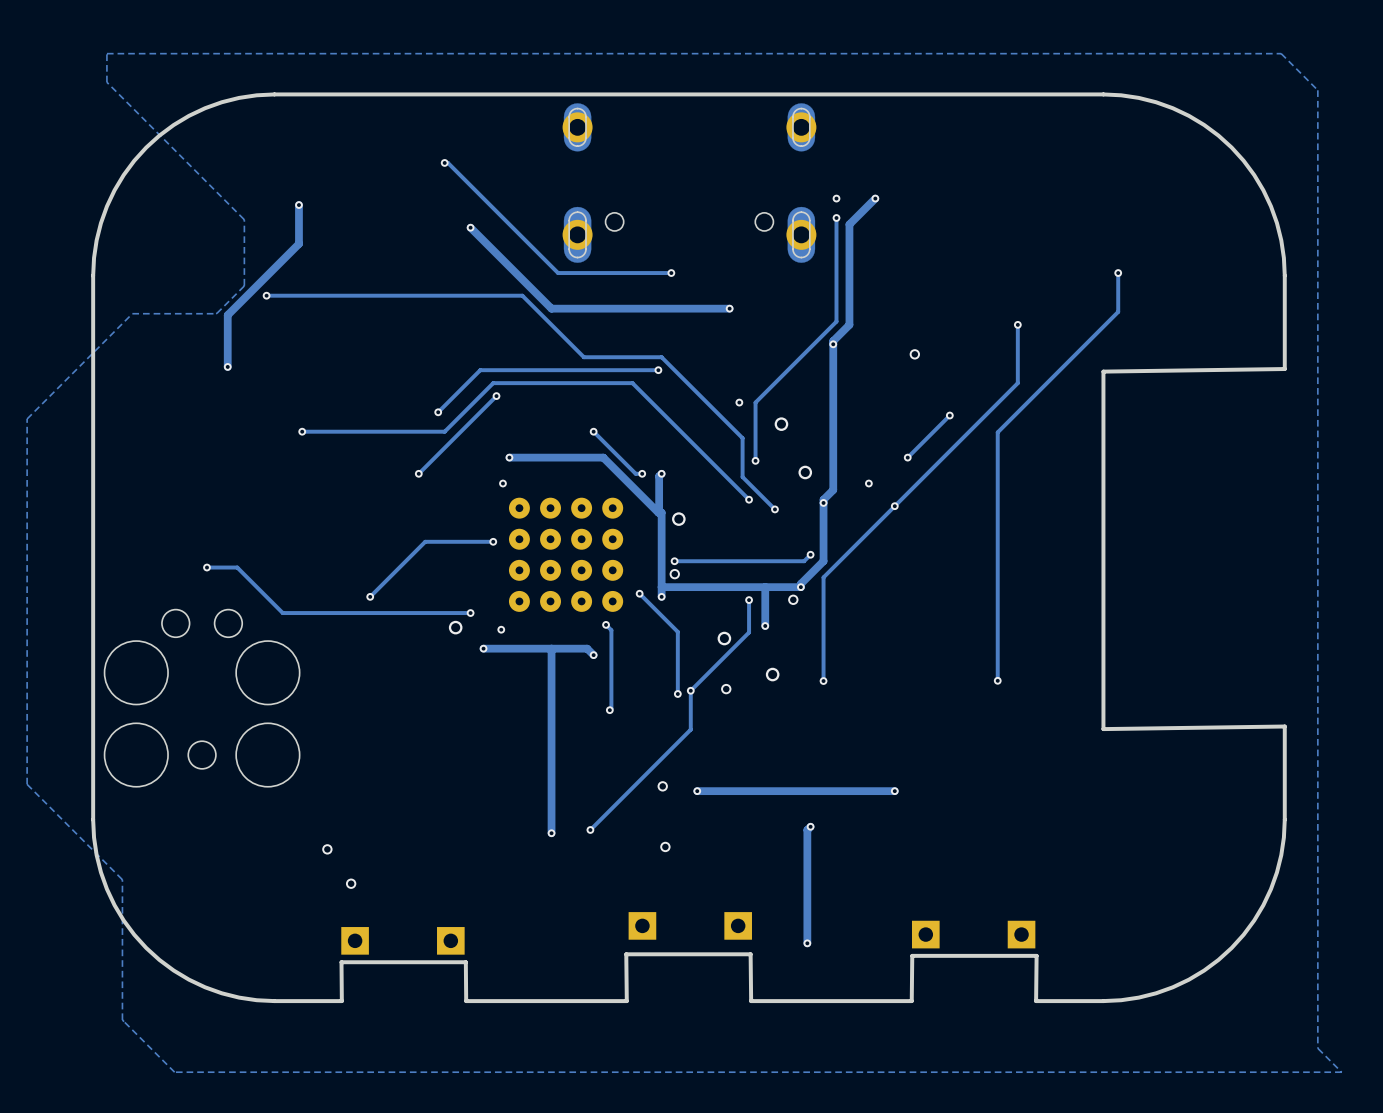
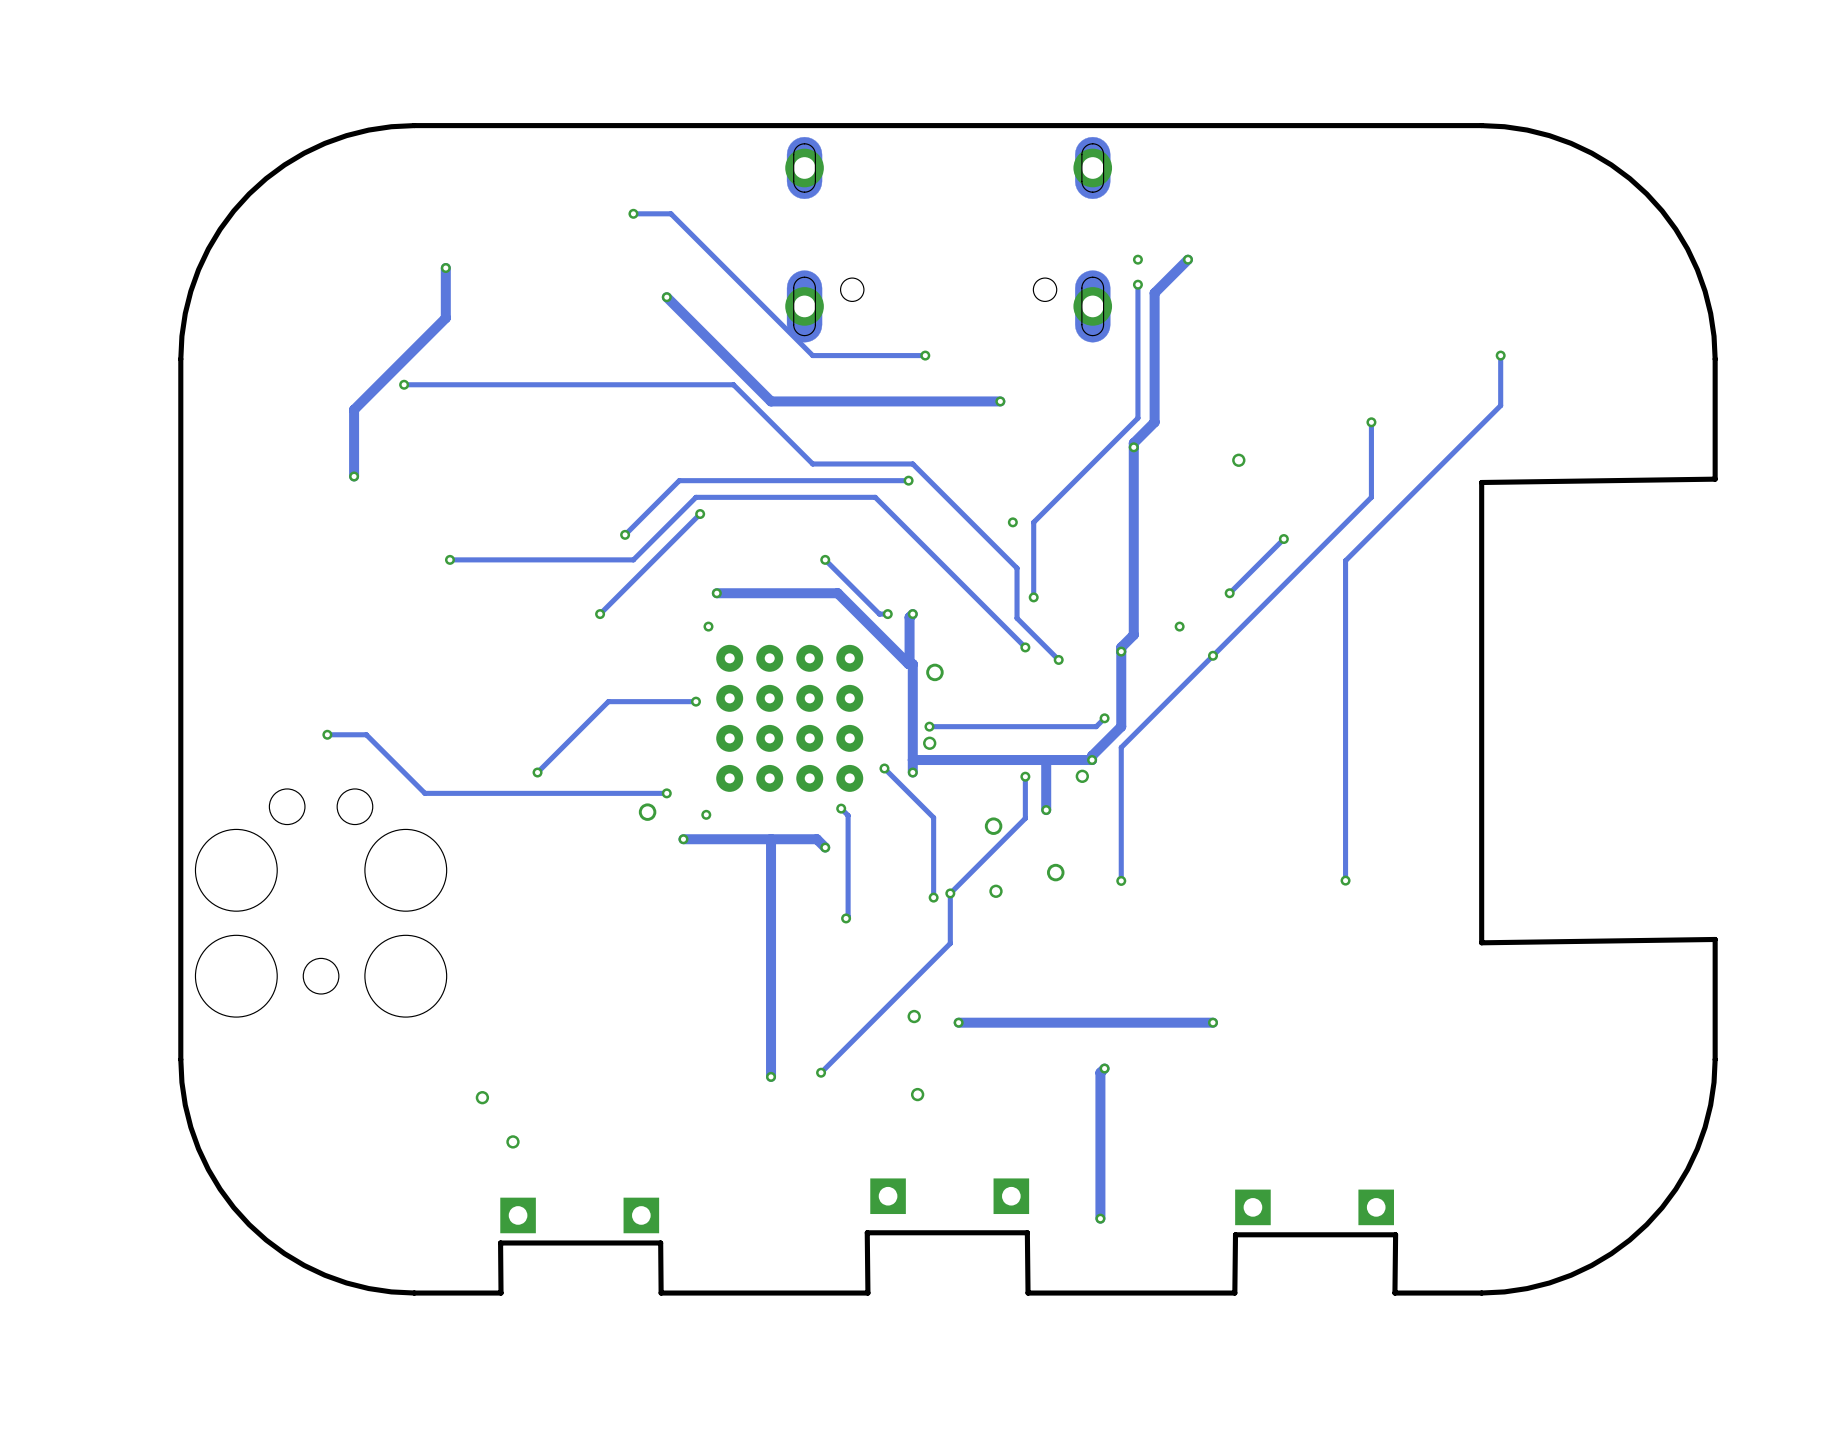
zone outline: (1281, 53) (106, 53) (106, 82) (244, 220) (244, 285) (216, 313) (132, 313) (27, 418) (27, 784) (122, 880) (122, 1020) (174, 1072) (1341, 1072) (1317, 1047) (1317, 90) (1281, 53) -> none
track: (447, 162) (558, 273) (583, 273) -> (637, 213) (670, 213) (812, 355)
via: (781, 424) -> none
via: (805, 472) -> none

